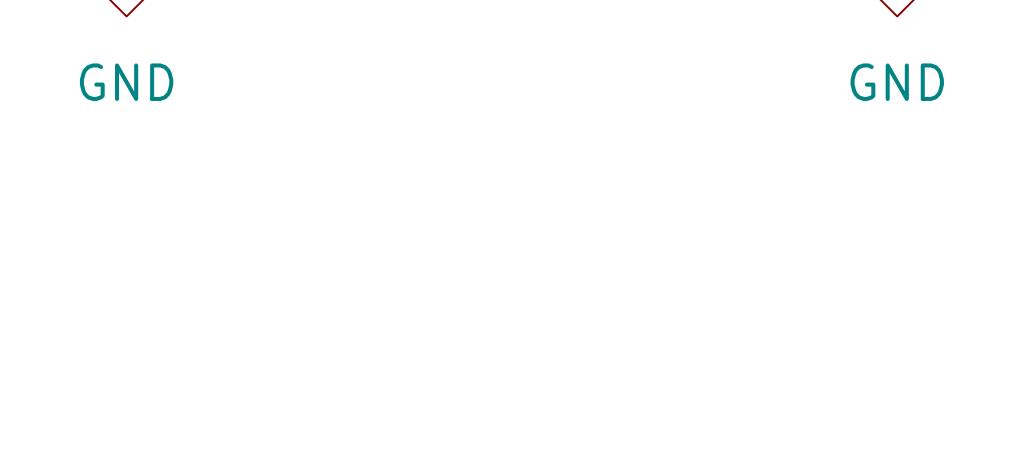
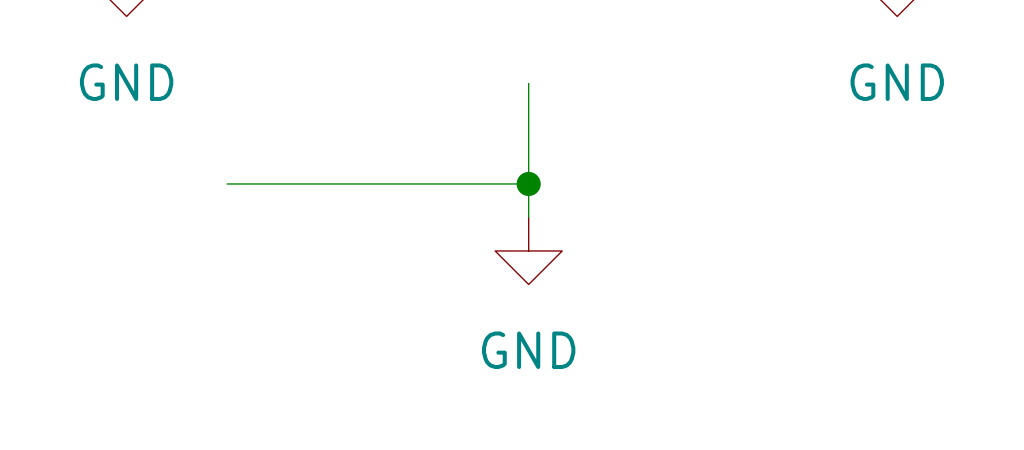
wire: none -> (528, 83) (528, 217)
wire: none -> (227, 183) (528, 183)
junction: none -> (528, 183)
power symbol: none -> GND (528, 250)

